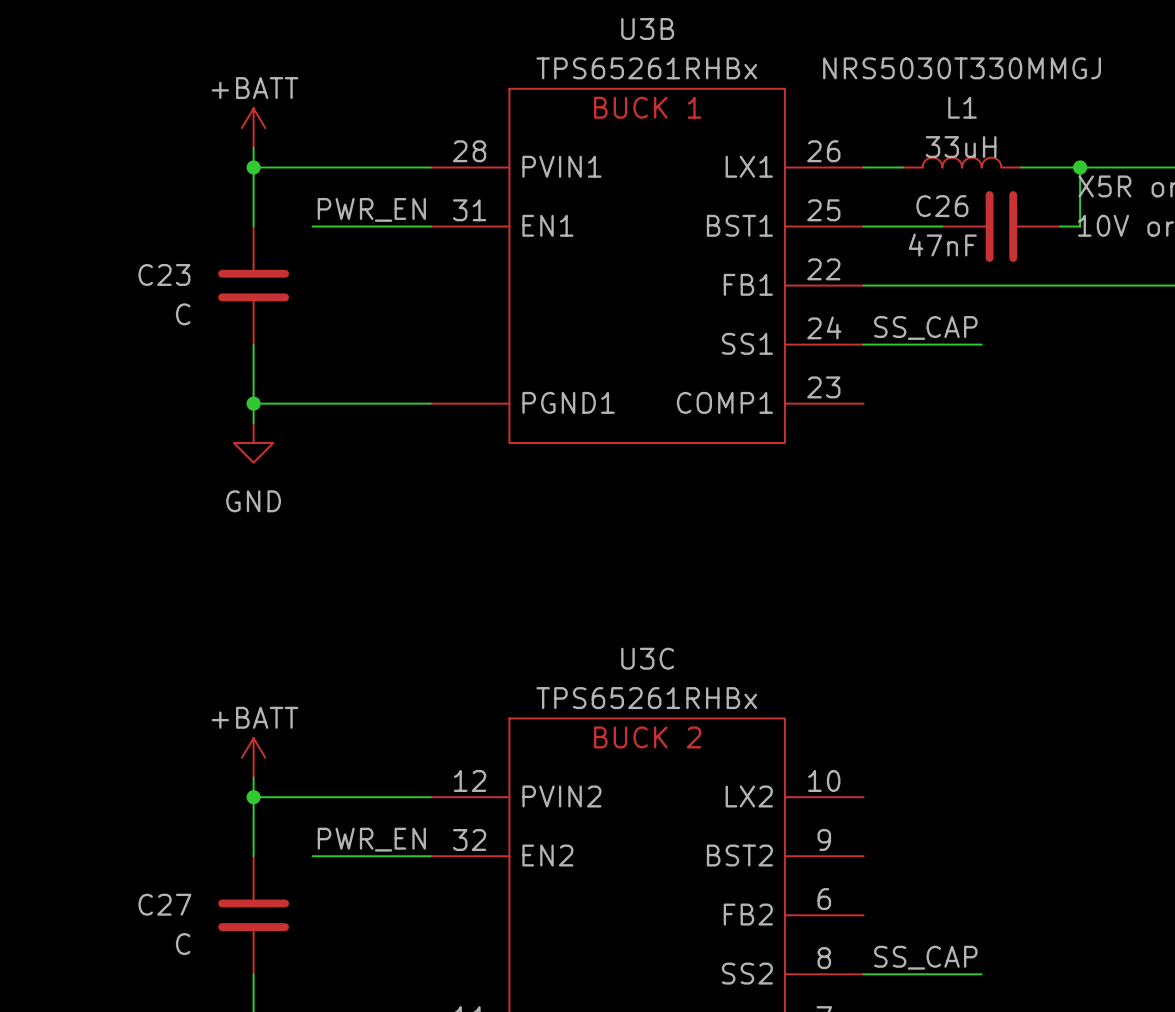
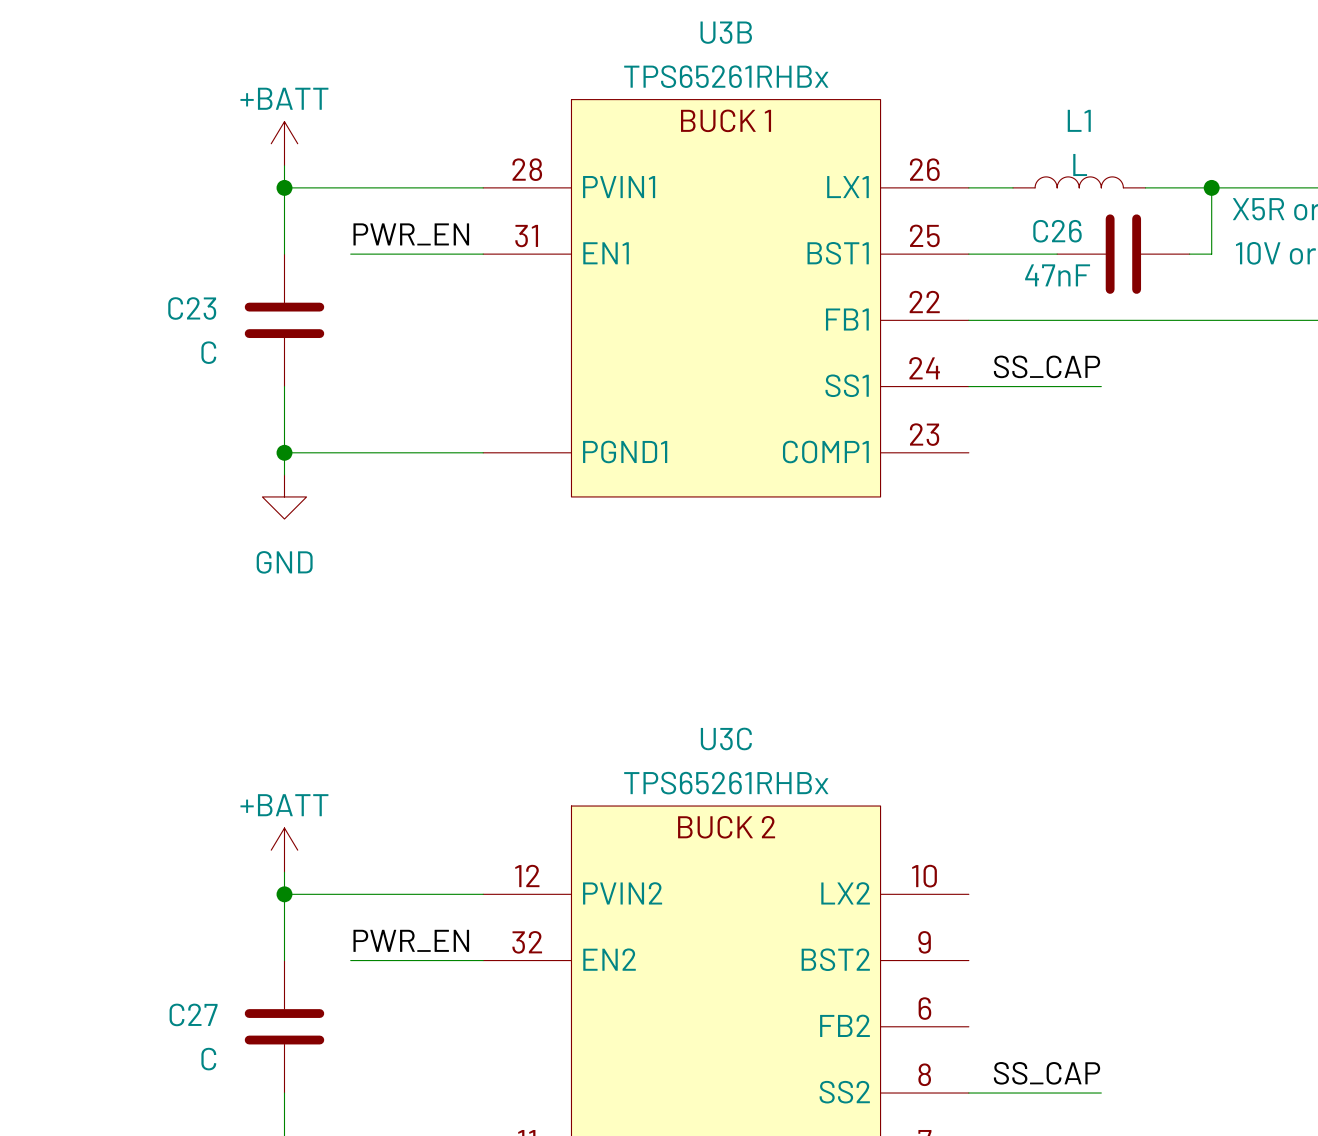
L1 text: NRS5030T330MMGJ (962, 68) -> none
L1 value: 33uH (961, 147) -> L (1080, 164)

